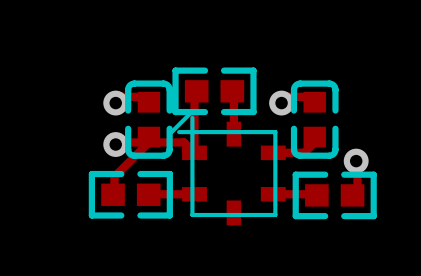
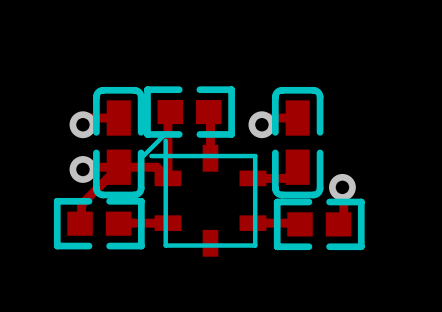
part footprint: [125, 80, 173, 159] -> [93, 86, 145, 199]
part footprint: [290, 80, 339, 159] -> [271, 86, 324, 199]

